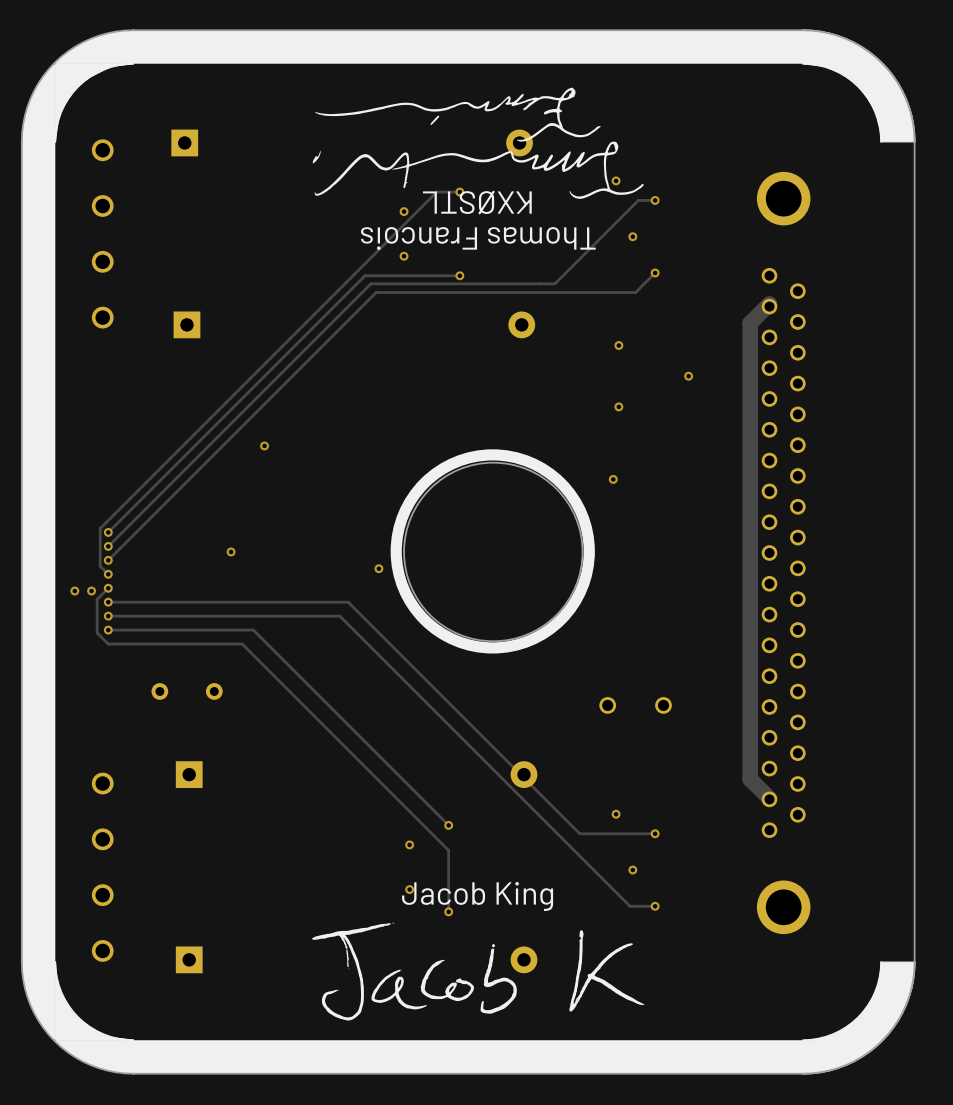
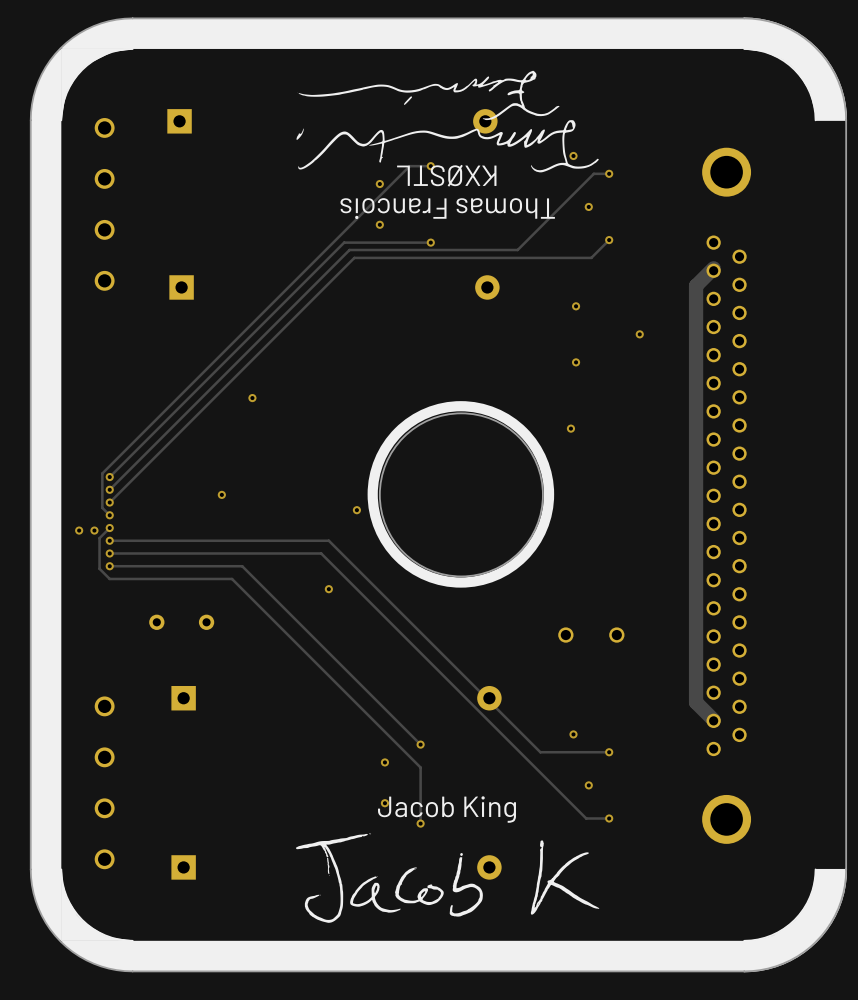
via: none -> (328, 589)

